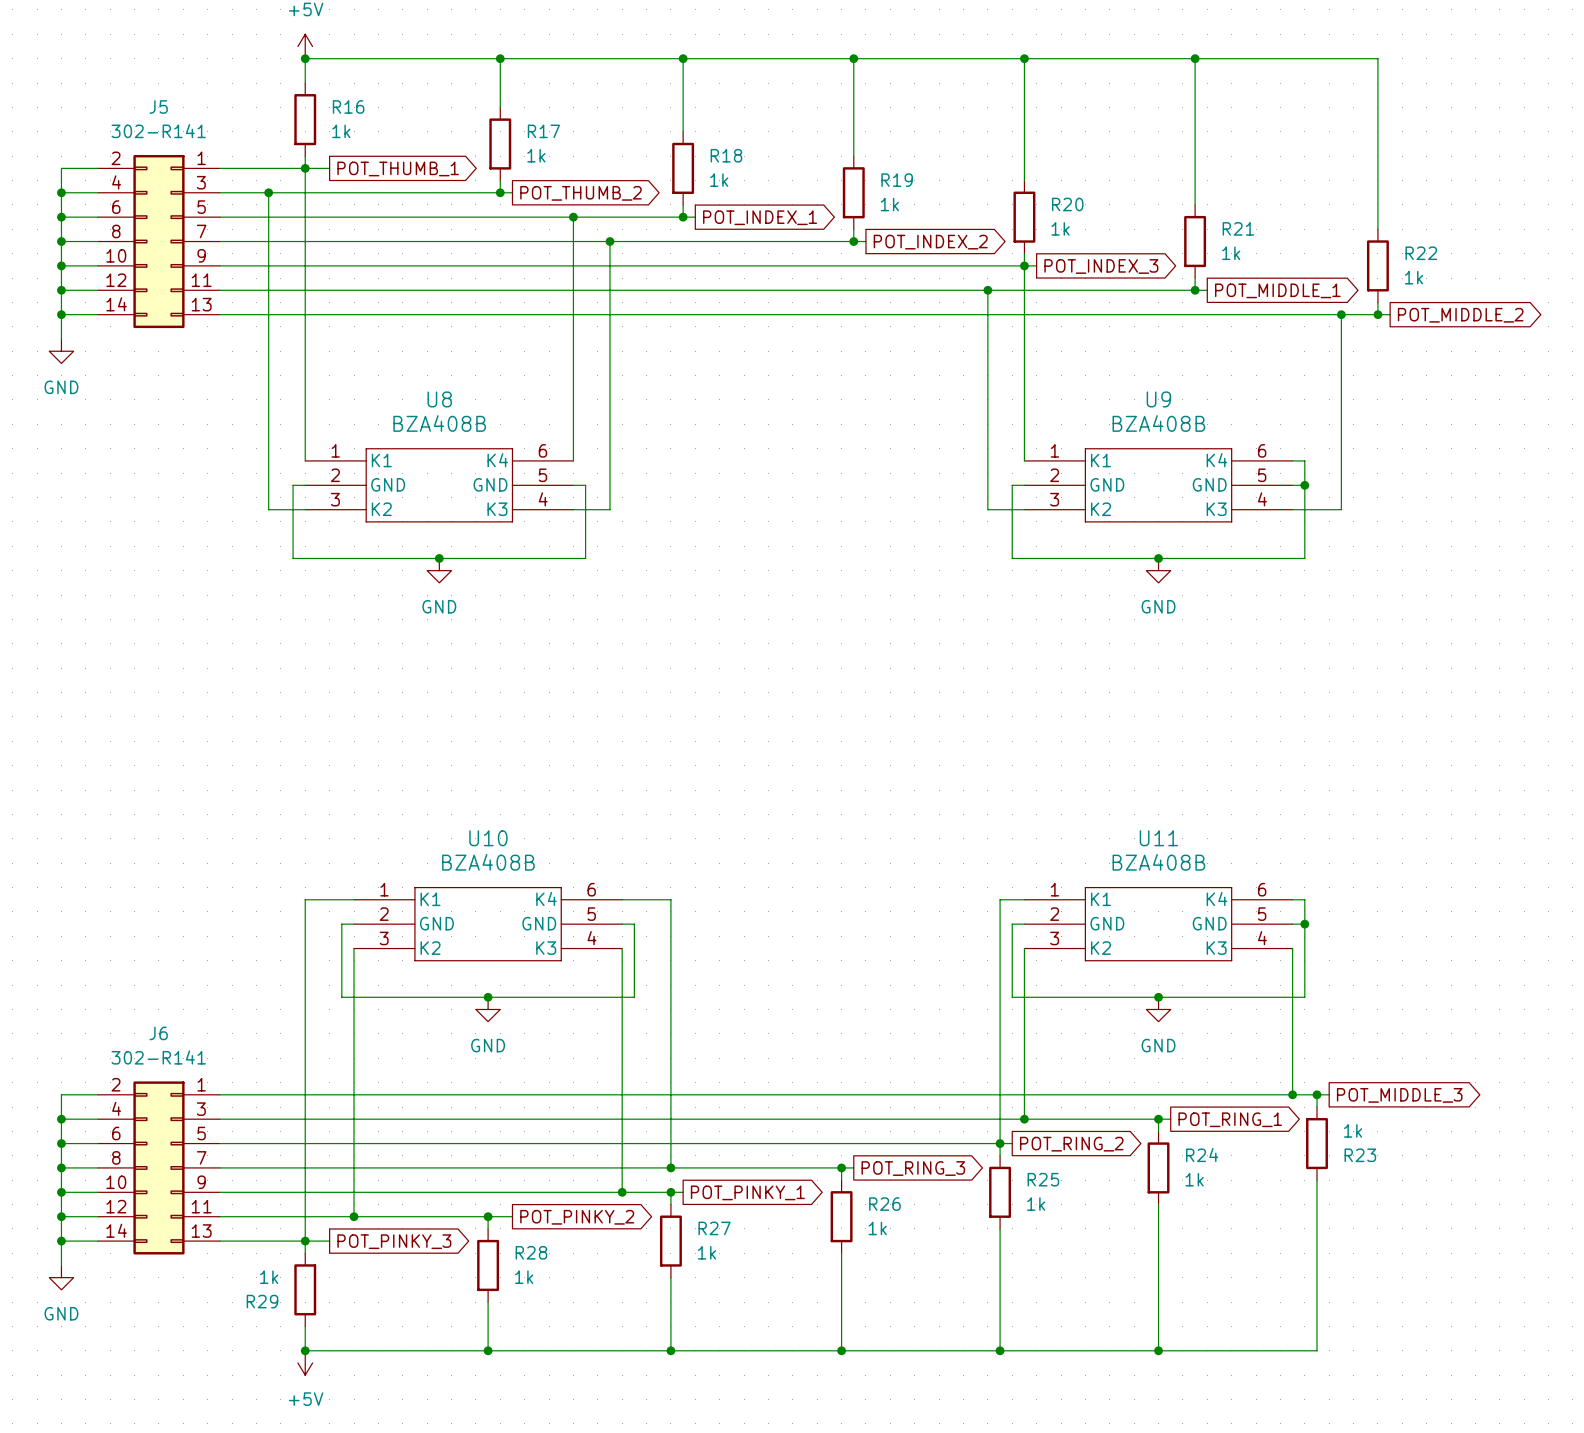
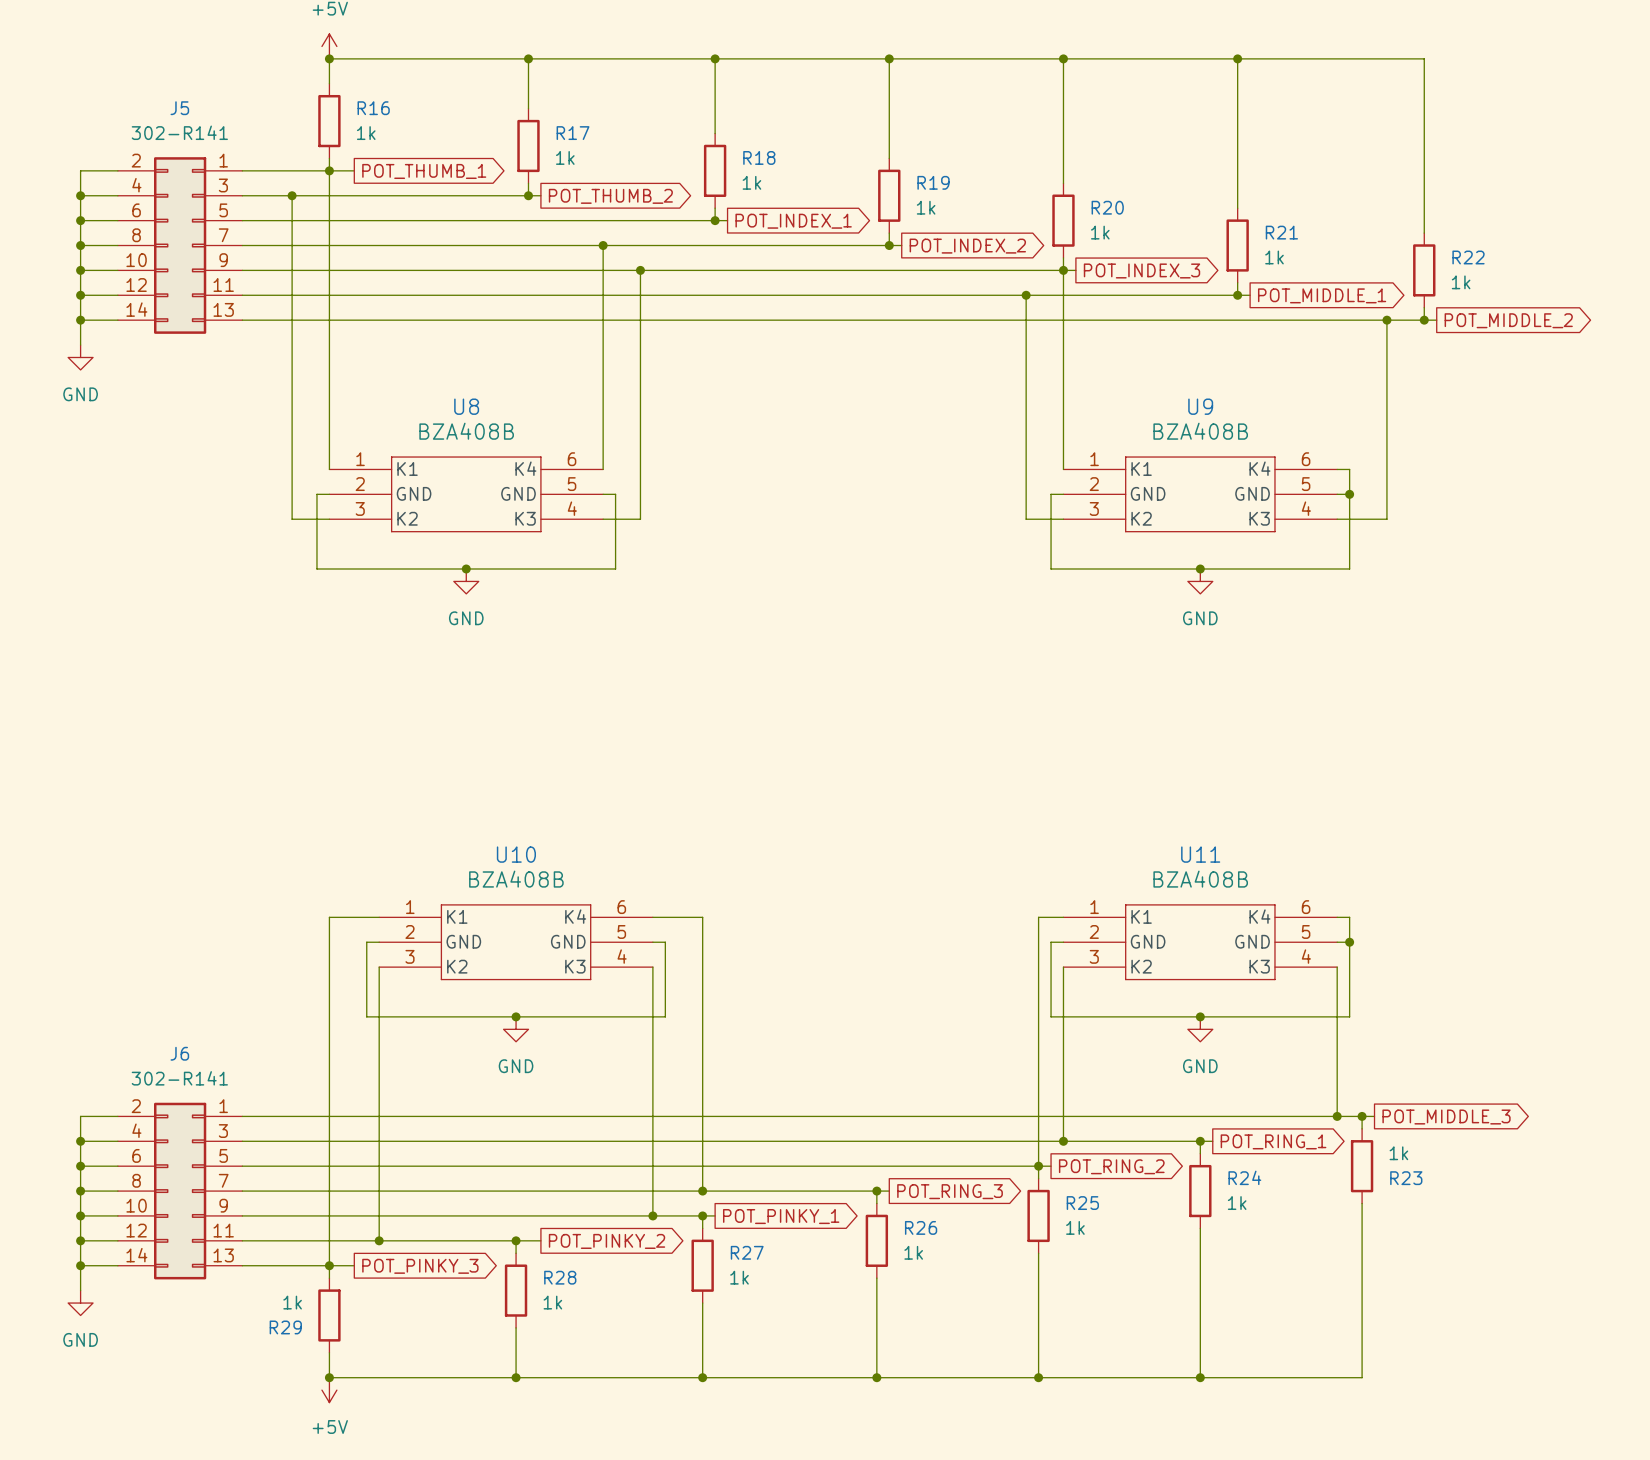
wire: (573, 217) (573, 241) -> none
junction: (573, 217) -> none
junction: none -> (603, 245)
wire: (609, 241) (609, 265) -> none
junction: (609, 241) -> none
junction: none -> (640, 270)

